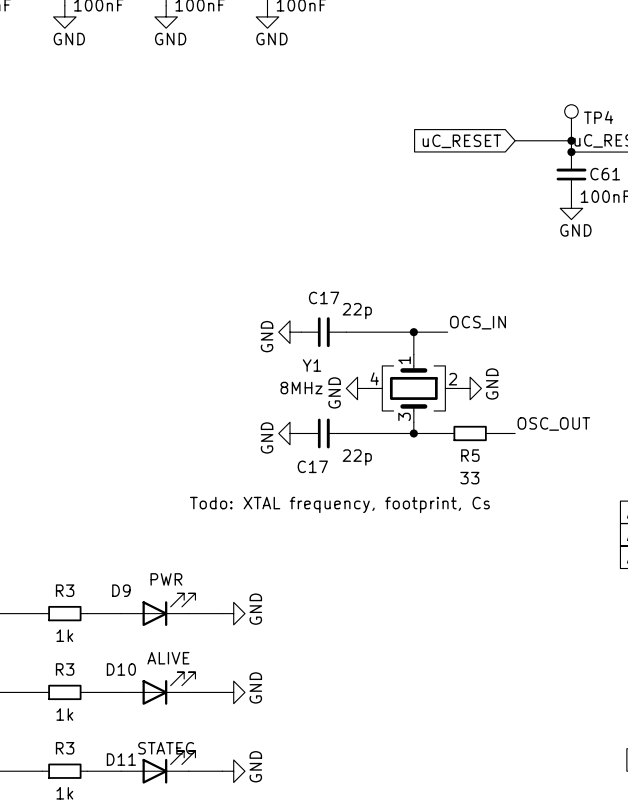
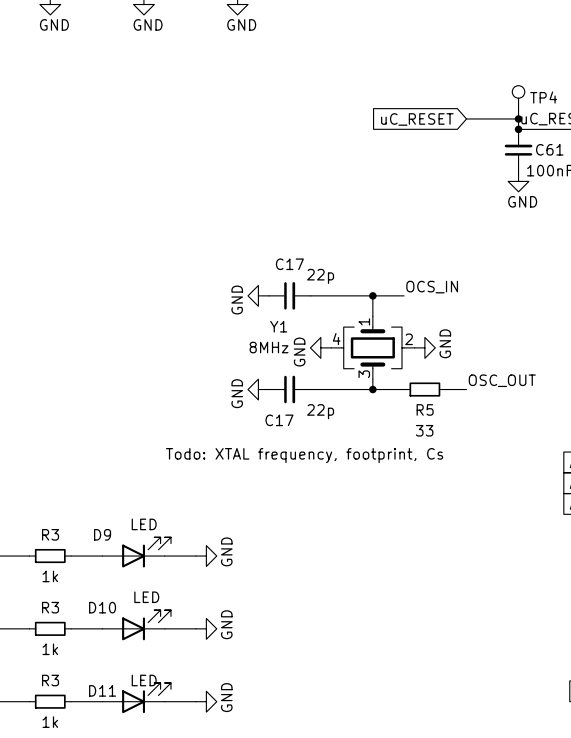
D9 value: PWR (166, 579) -> LED (144, 524)
D10 value: ALIVE (168, 658) -> LED (146, 597)
D11 value: STATEC (166, 748) -> LED (144, 680)

